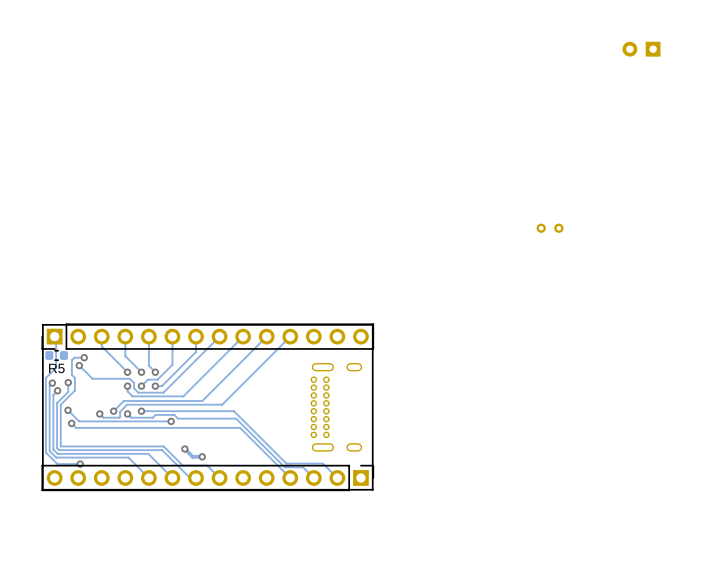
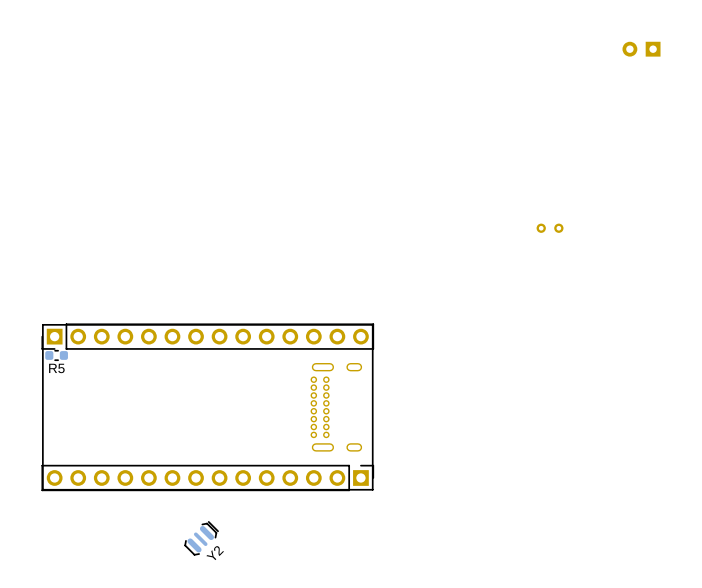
track: (54, 336) (56, 367) (45, 378) (45, 452) (57, 464) (80, 464) -> none
track: (101, 336) (101, 346) (127, 372) -> none
track: (125, 336) (125, 356) (141, 372) -> none
track: (148, 336) (148, 365) (155, 372) -> none
track: (172, 336) (172, 364) (157, 379) (147, 379) (141, 386) -> none
track: (196, 336) (196, 351) (161, 386) (155, 386) -> none
track: (219, 336) (163, 392) (138, 392) (129, 378) (92, 378) (79, 365) -> none
track: (243, 336) (183, 396) (132, 396) (127, 391) (127, 386) -> none
track: (266, 336) (202, 400) (123, 400) (113, 411) -> none
track: (290, 336) (222, 404) (127, 404) (120, 411) (119, 417) (103, 417) (99, 413) -> none
track: (84, 357) (74, 357) (71, 360) (74, 390) (60, 404) (60, 446) (163, 446) (182, 465) (207, 465) (219, 477) -> none
via: (84, 357) -> none
via: (79, 365) -> none
via: (127, 372) -> none
via: (141, 372) -> none
via: (155, 372) -> none
track: (68, 382) (68, 391) (57, 403) (57, 447) (59, 450) (162, 450) (190, 477) (196, 477) -> none
via: (68, 382) -> none
track: (52, 383) (49, 385) (49, 451) (56, 457) (128, 457) (148, 477) -> none
via: (52, 383) -> none
via: (127, 386) -> none
via: (141, 386) -> none
via: (155, 386) -> none
track: (57, 390) (53, 395) (53, 449) (57, 453) (148, 453) (172, 477) -> none
via: (57, 390) -> none
track: (67, 410) (79, 421) (171, 421) -> none
via: (67, 410) -> none
via: (113, 411) -> none
track: (141, 411) (233, 411) (286, 463) (323, 463) (337, 477) -> none
via: (141, 411) -> none
via: (99, 413) -> none
track: (127, 413) (131, 417) (174, 414) (177, 418) (236, 418) (284, 467) (303, 467) (313, 477) -> none
via: (127, 413) -> none
via: (171, 421) -> none
track: (71, 423) (76, 427) (240, 427) (290, 477) -> none
via: (71, 423) -> none
track: (184, 449) (192, 456) (202, 456) -> none
via: (184, 449) -> none
via: (202, 456) -> none
via: (80, 464) -> none
Y2: none -> (201, 538)

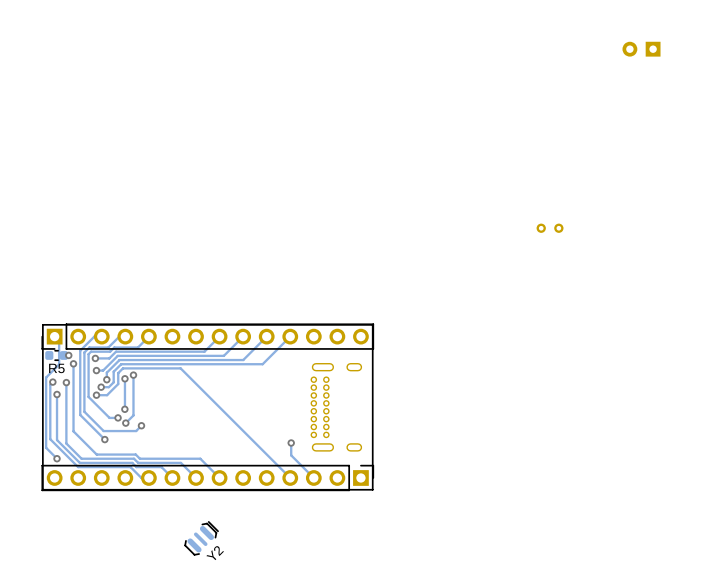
track: none -> (54, 336) (59, 341) (59, 364) (46, 377) (46, 447) (57, 458)
track: none -> (101, 336) (94, 336) (80, 350) (80, 414) (104, 439)
track: none -> (125, 336) (119, 336) (108, 347) (89, 347) (84, 352) (84, 411) (103, 431) (136, 431) (141, 425)
track: none -> (148, 336) (138, 347) (114, 347) (110, 351) (91, 351) (88, 354) (88, 396) (109, 417) (118, 417)
track: none -> (219, 336) (204, 351) (116, 351) (109, 358) (95, 358)
track: none -> (243, 336) (223, 355) (117, 355) (103, 370) (96, 370)
track: none -> (266, 336) (243, 360) (119, 360) (106, 372) (106, 379)
track: none -> (290, 336) (262, 364) (121, 364) (113, 371) (113, 382) (108, 387) (101, 387)
via: none -> (68, 355)
via: none -> (95, 358)
track: none -> (73, 363) (73, 431) (96, 454) (135, 454) (139, 458) (200, 458) (219, 477)
via: none -> (73, 363)
via: none -> (96, 370)
track: none -> (133, 375) (133, 415) (125, 423)
via: none -> (133, 375)
track: none -> (124, 378) (124, 409)
via: none -> (124, 378)
via: none -> (106, 379)
track: none -> (52, 382) (50, 384) (50, 439) (78, 467) (130, 467) (141, 477) (148, 477)
via: none -> (52, 382)
track: none -> (66, 382) (66, 443) (81, 458) (134, 458) (138, 462) (180, 462) (196, 477)
via: none -> (66, 382)
via: none -> (101, 387)
track: none -> (57, 394) (57, 440) (79, 462) (132, 462) (136, 467) (161, 467) (172, 477)
via: none -> (57, 394)
track: none -> (96, 395) (107, 395) (118, 384) (118, 373) (122, 368) (180, 368) (290, 477)
via: none -> (96, 395)
via: none -> (124, 409)
via: none -> (118, 417)
via: none -> (125, 423)
via: none -> (141, 425)
via: none -> (104, 439)
track: none -> (291, 442) (291, 455) (313, 477)
via: none -> (291, 442)
via: none -> (57, 458)

